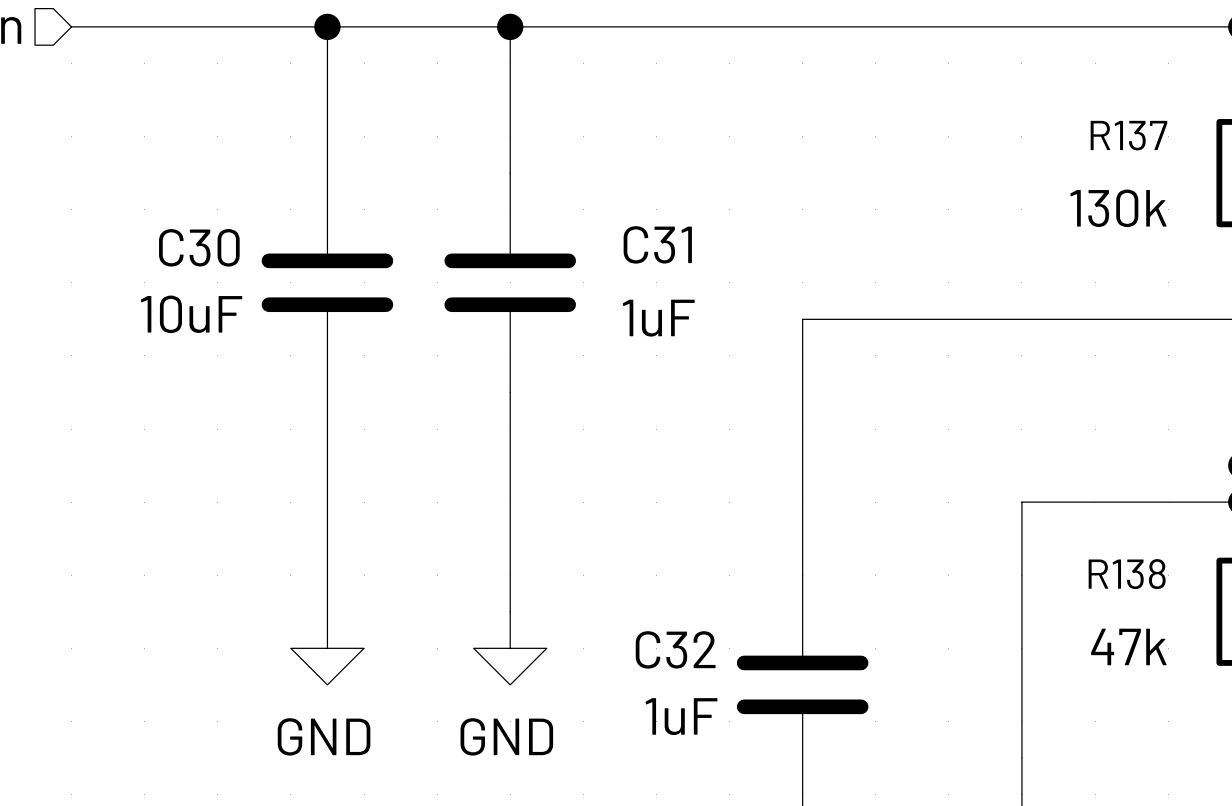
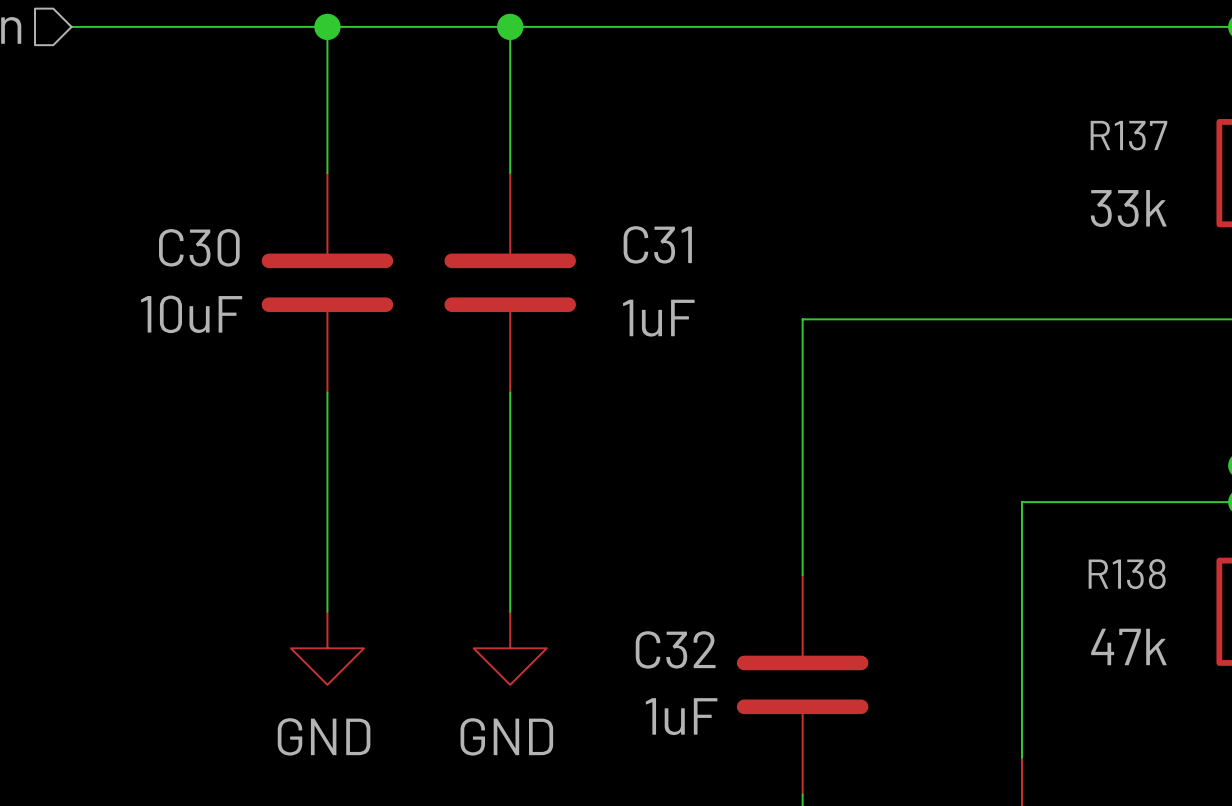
R137 value: 130k (1118, 208) -> 33k (1128, 208)

